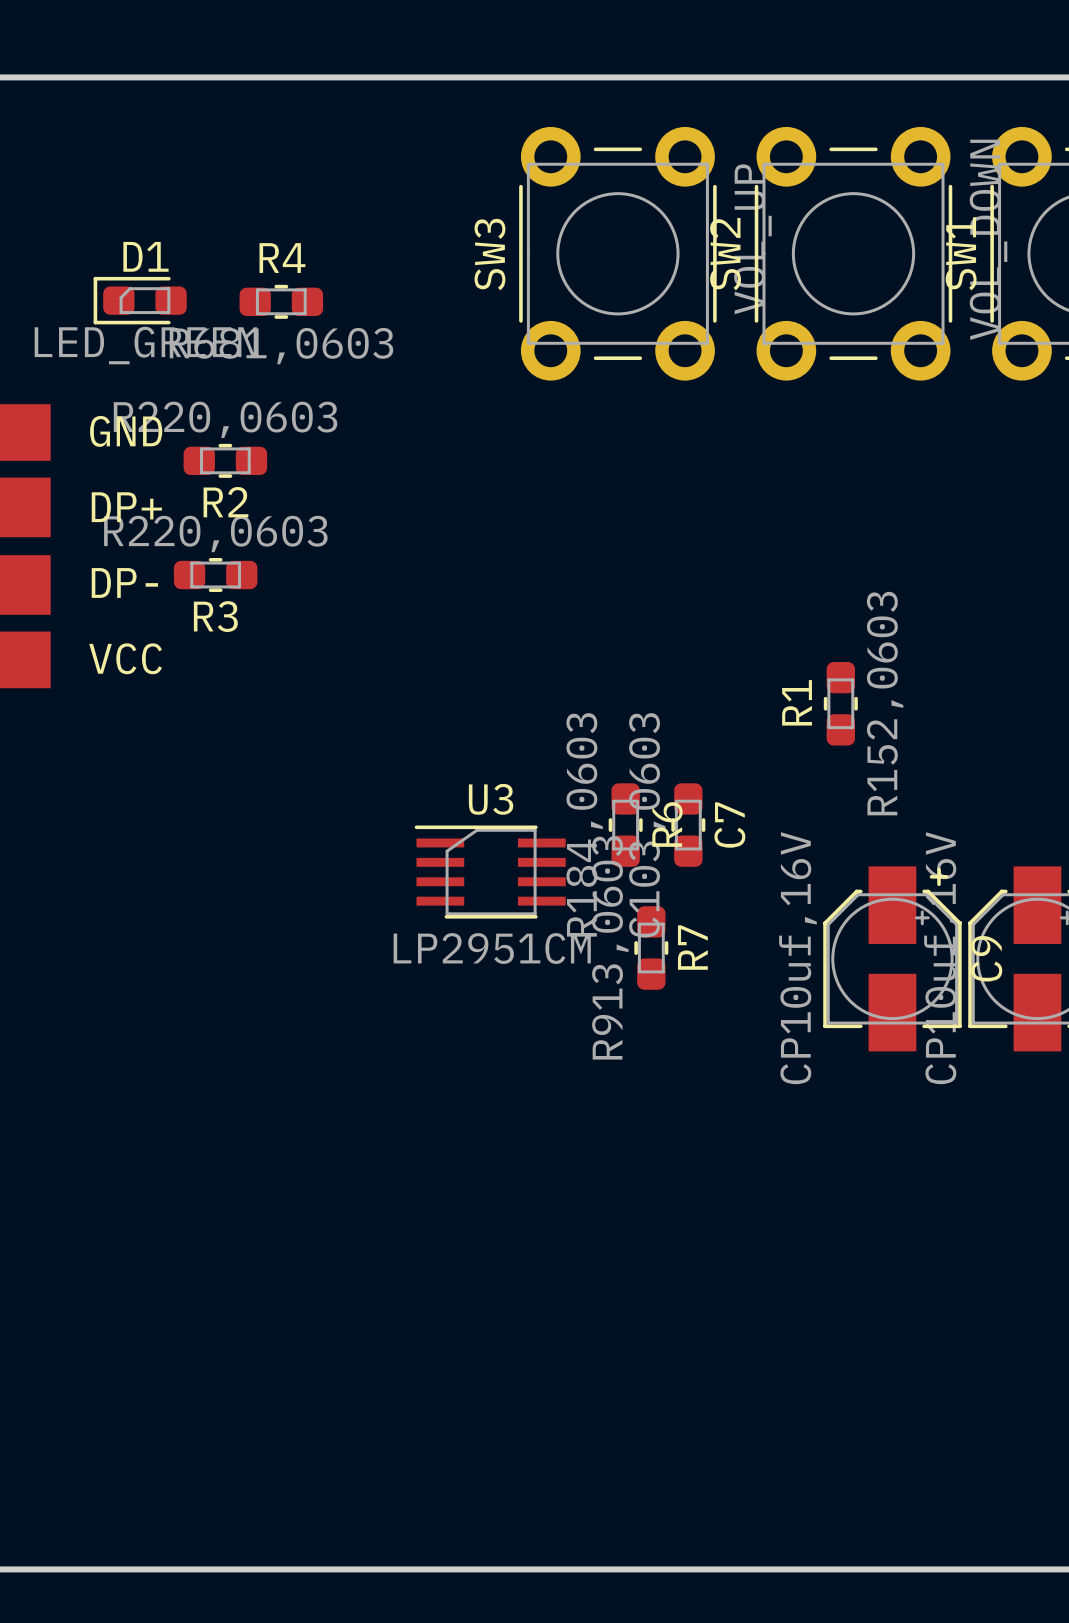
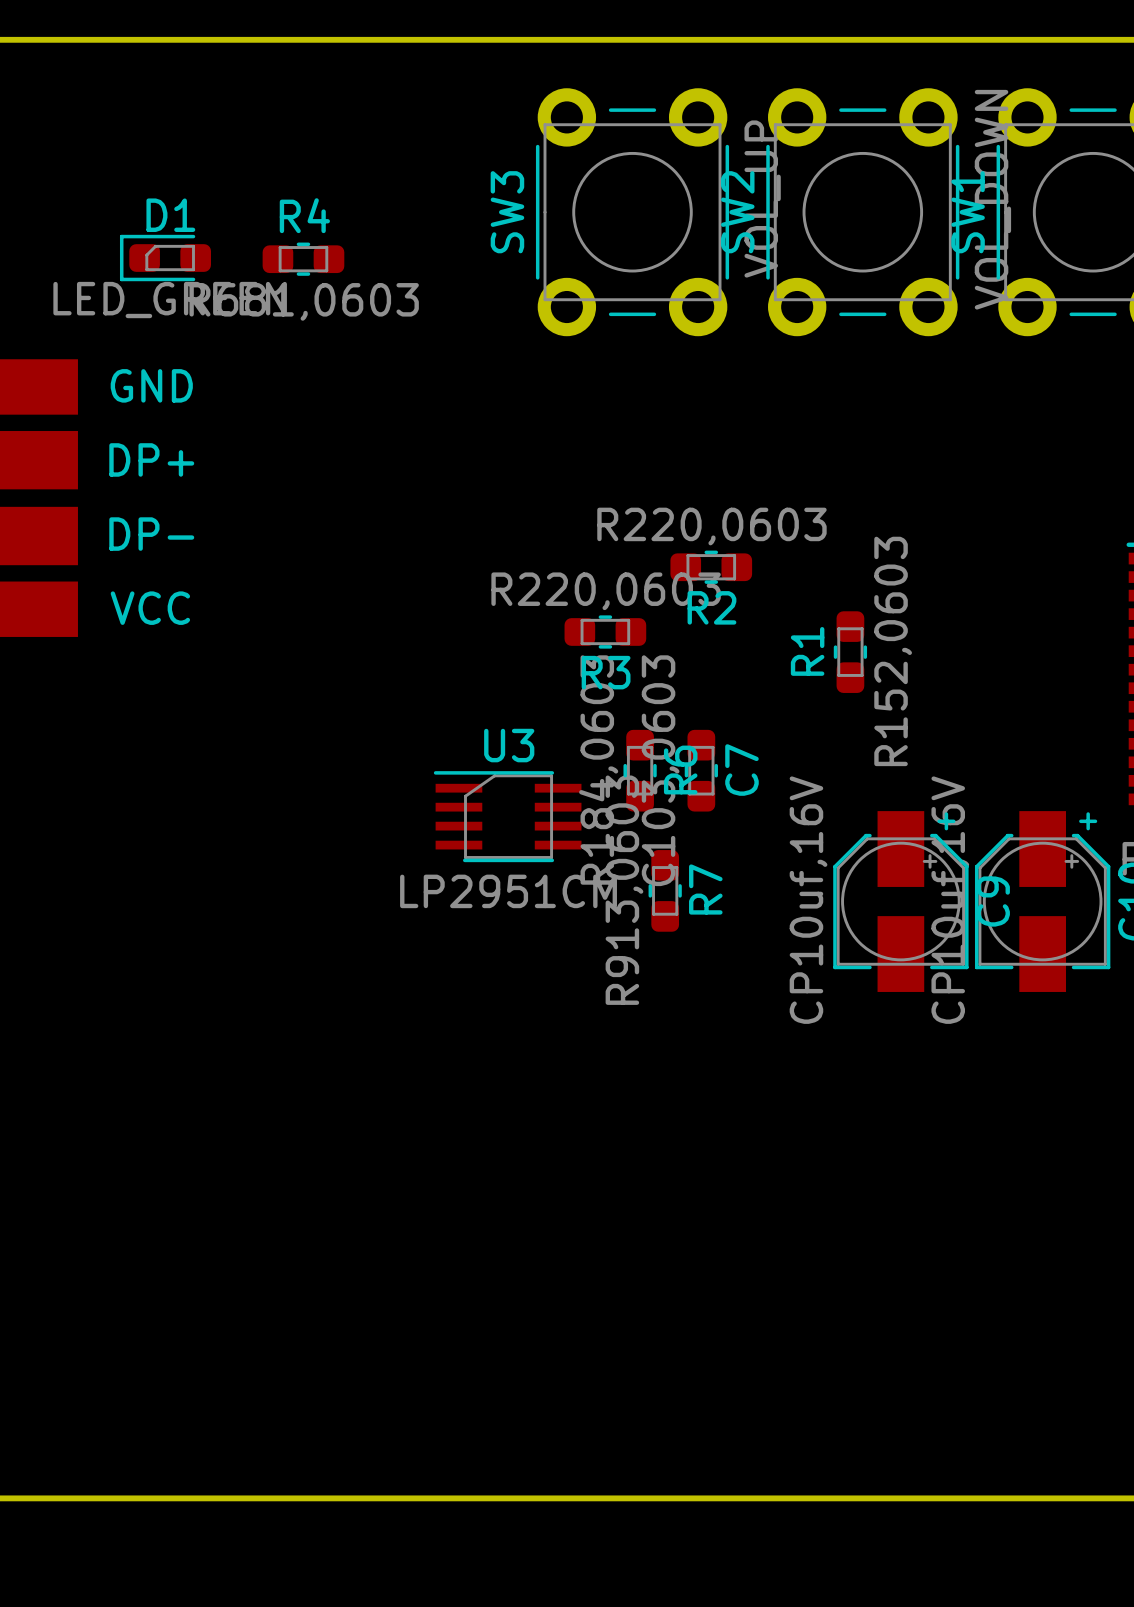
R2 position: (225, 460) -> (711, 567)
R3 position: (215, 575) -> (605, 631)

